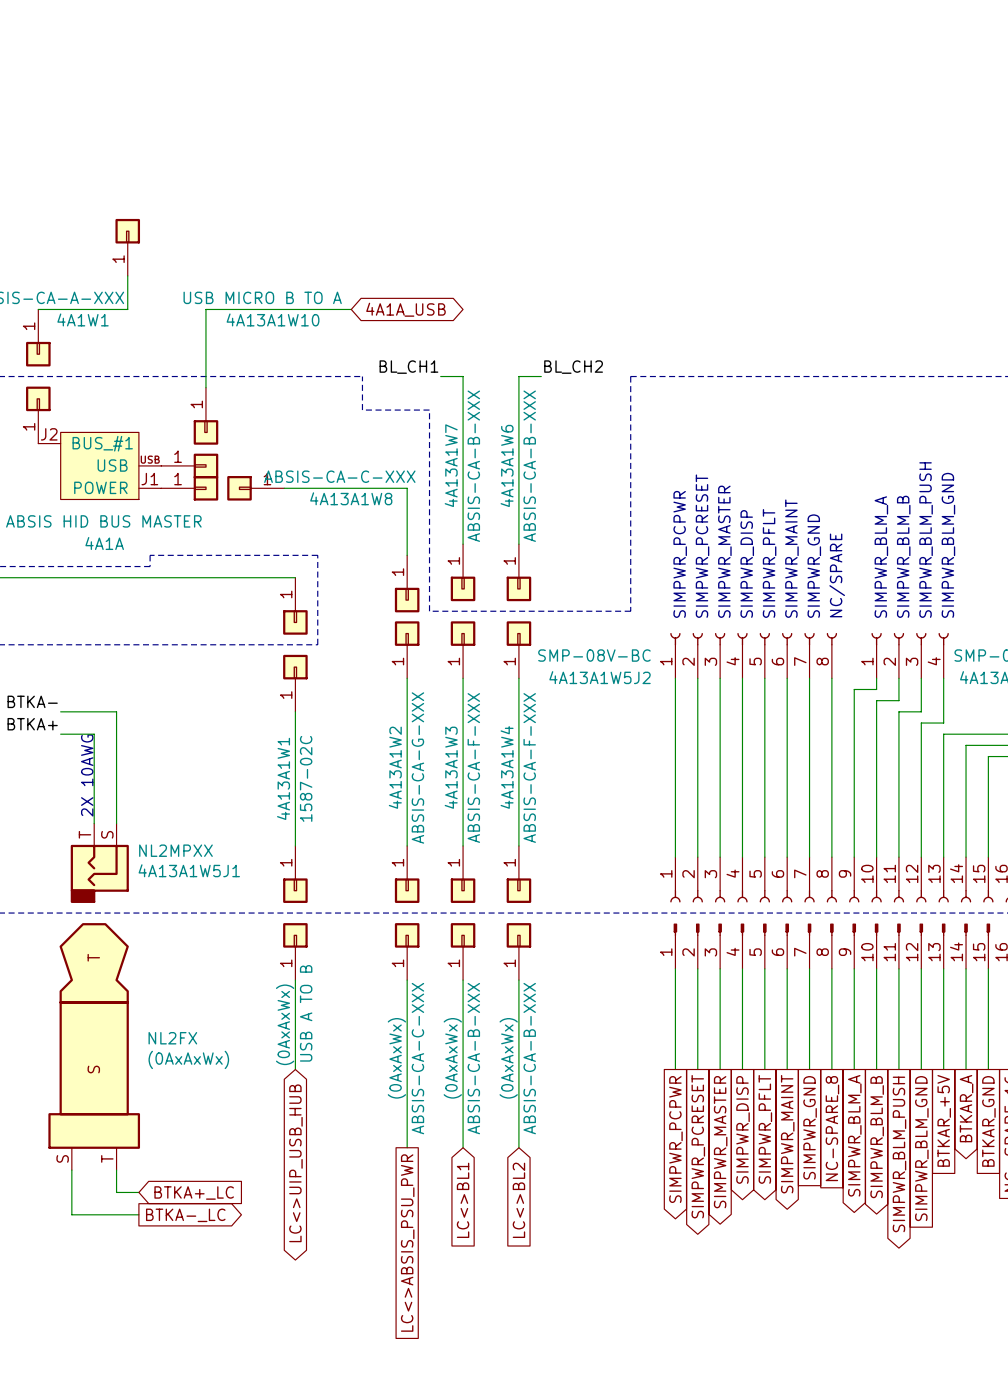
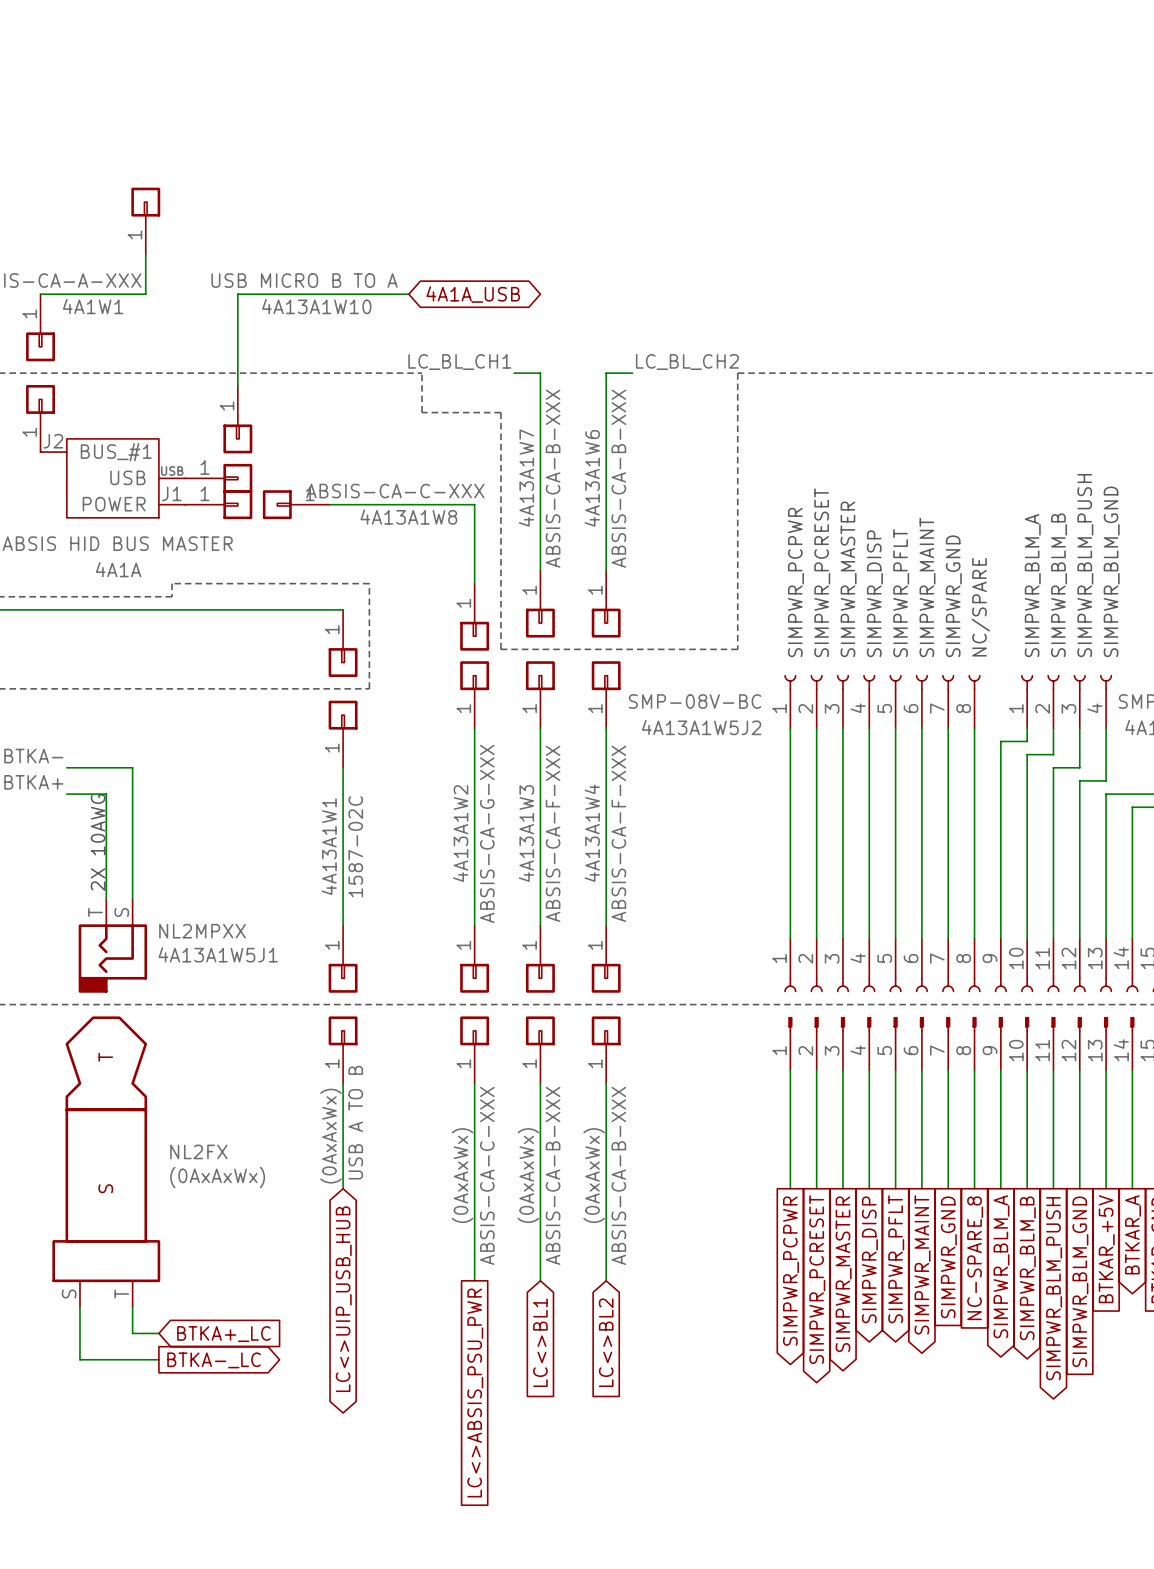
label: BL_CH1 (408, 367) -> LC_BL_CH1 (459, 362)
label: BL_CH2 (573, 367) -> LC_BL_CH2 (687, 362)

